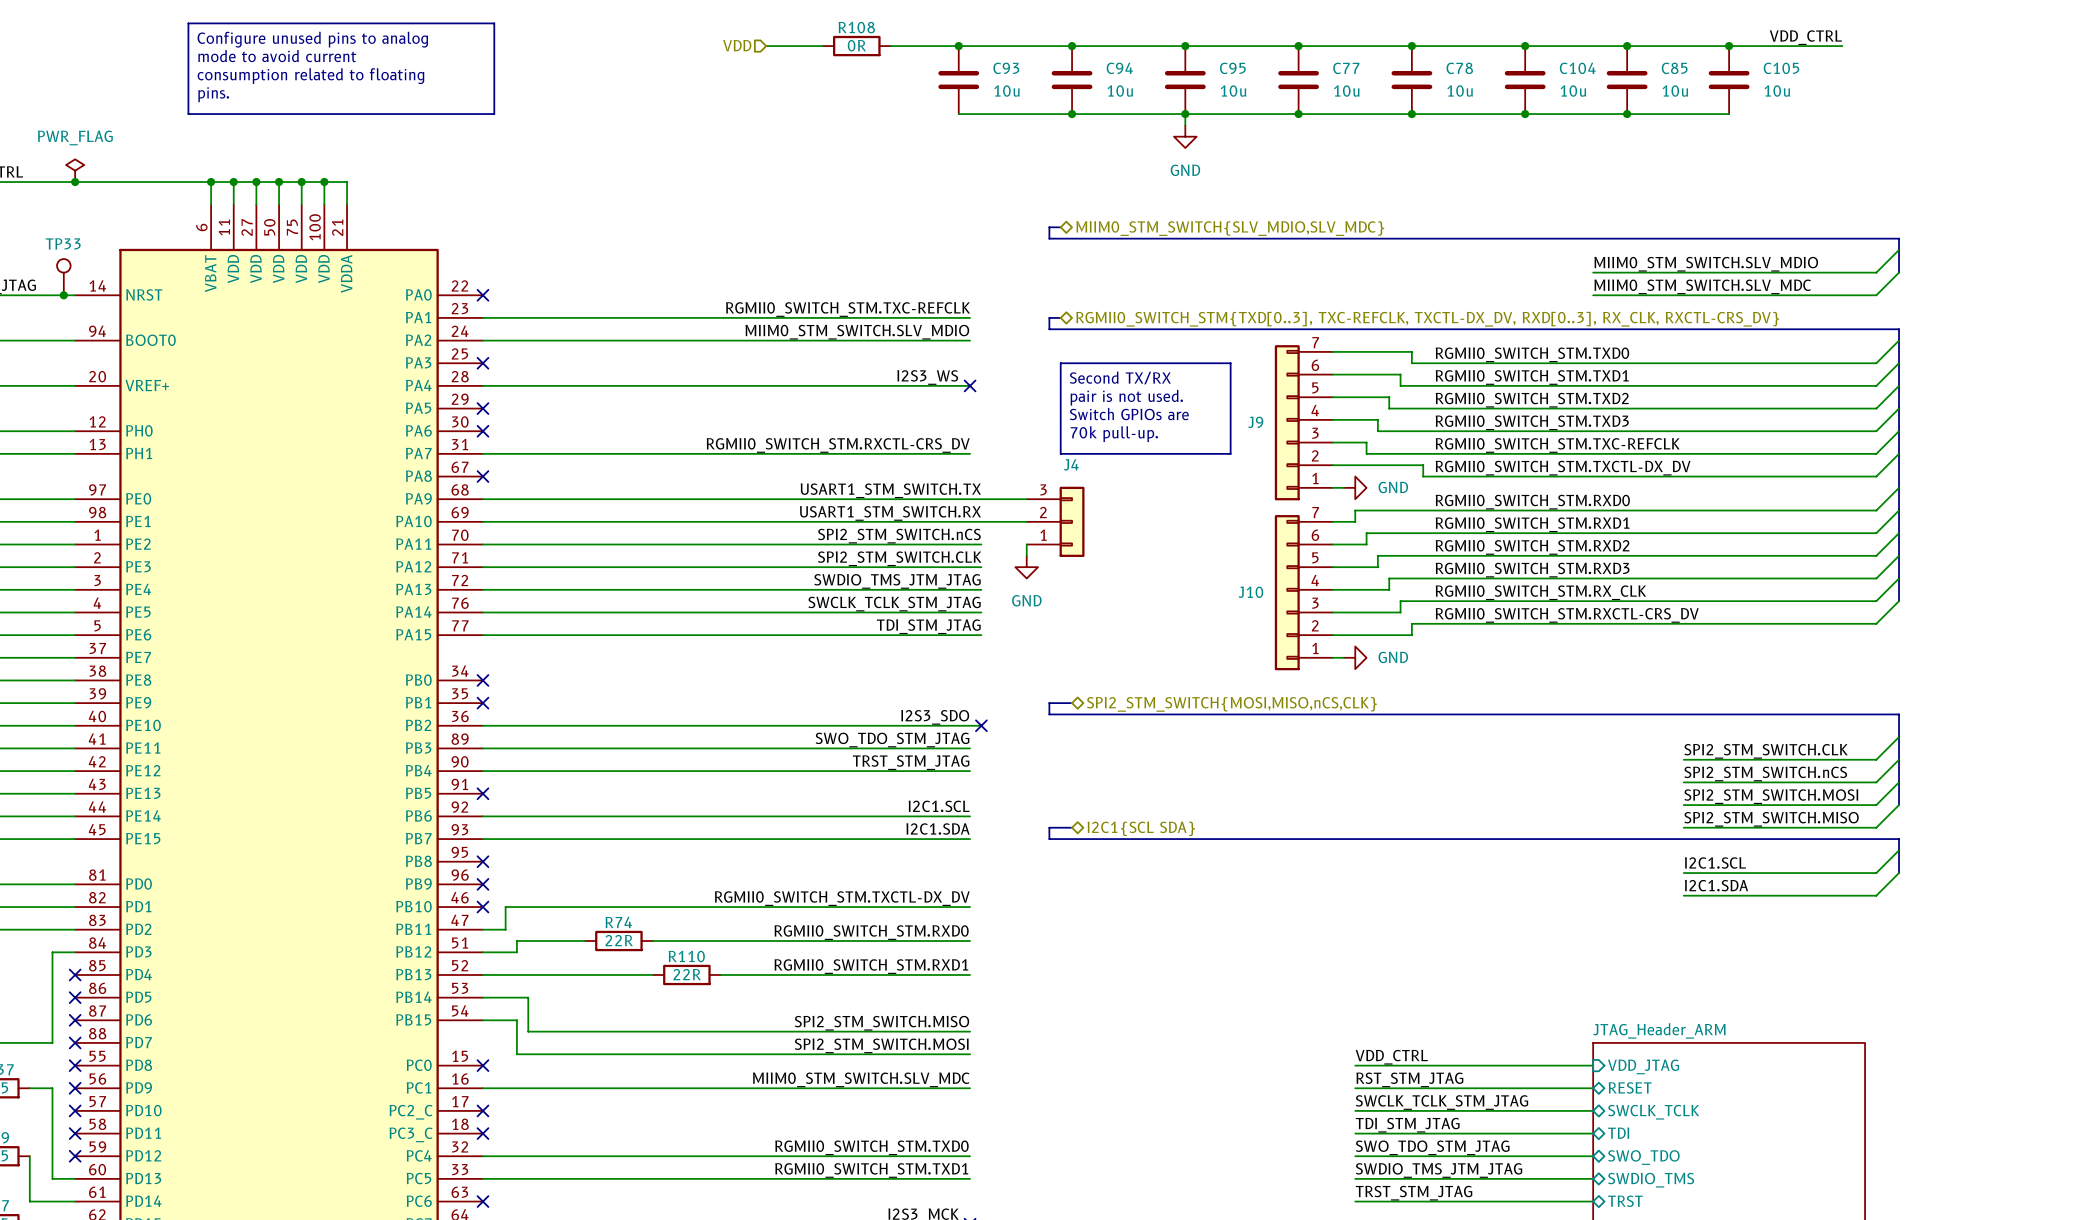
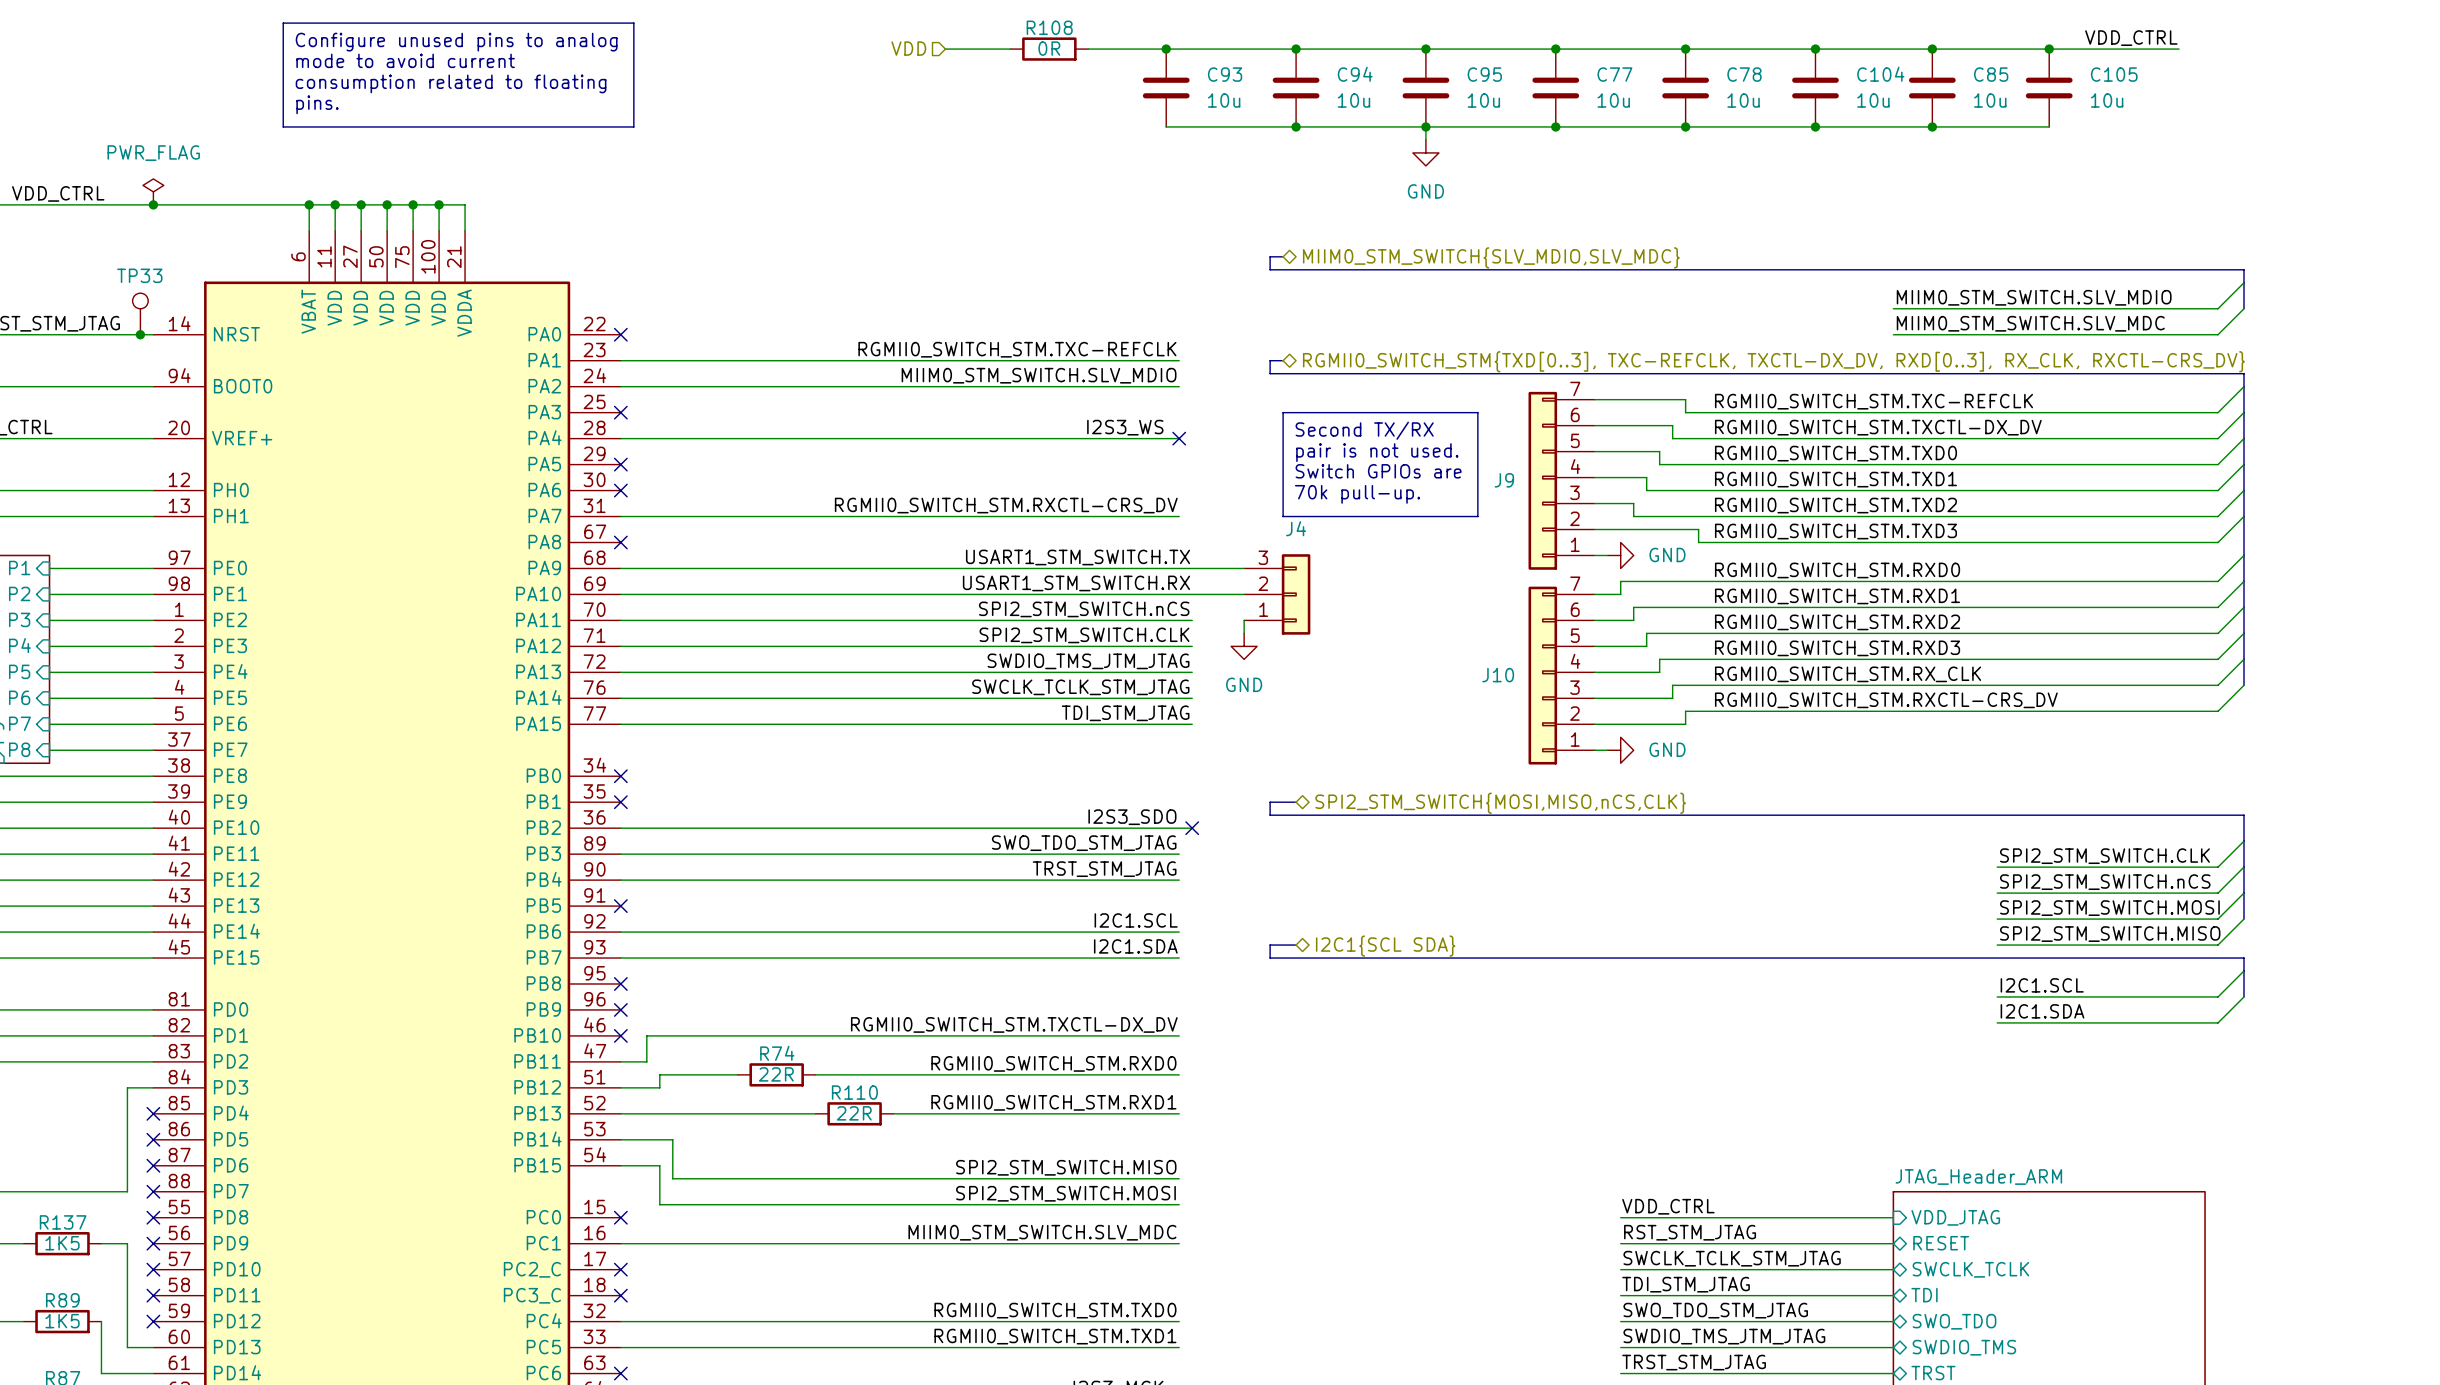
label: RGMII0_SWITCH_STM.TXD0 (1532, 354) -> RGMII0_SWITCH_STM.TXC-REFCLK (1874, 401)
label: RGMII0_SWITCH_STM.TXD1 (1532, 377) -> RGMII0_SWITCH_STM.TXCTL-DX_DV (1878, 427)
label: RGMII0_SWITCH_STM.TXD2 (1532, 400) -> RGMII0_SWITCH_STM.TXD0 (1835, 453)
label: RGMII0_SWITCH_STM.TXD3 (1532, 422) -> RGMII0_SWITCH_STM.TXD1 (1835, 479)
label: RGMII0_SWITCH_STM.TXC-REFCLK (1557, 445) -> RGMII0_SWITCH_STM.TXD2 (1835, 505)
label: RGMII0_SWITCH_STM.TXCTL-DX_DV (1563, 468) -> RGMII0_SWITCH_STM.TXD3 (1835, 531)

